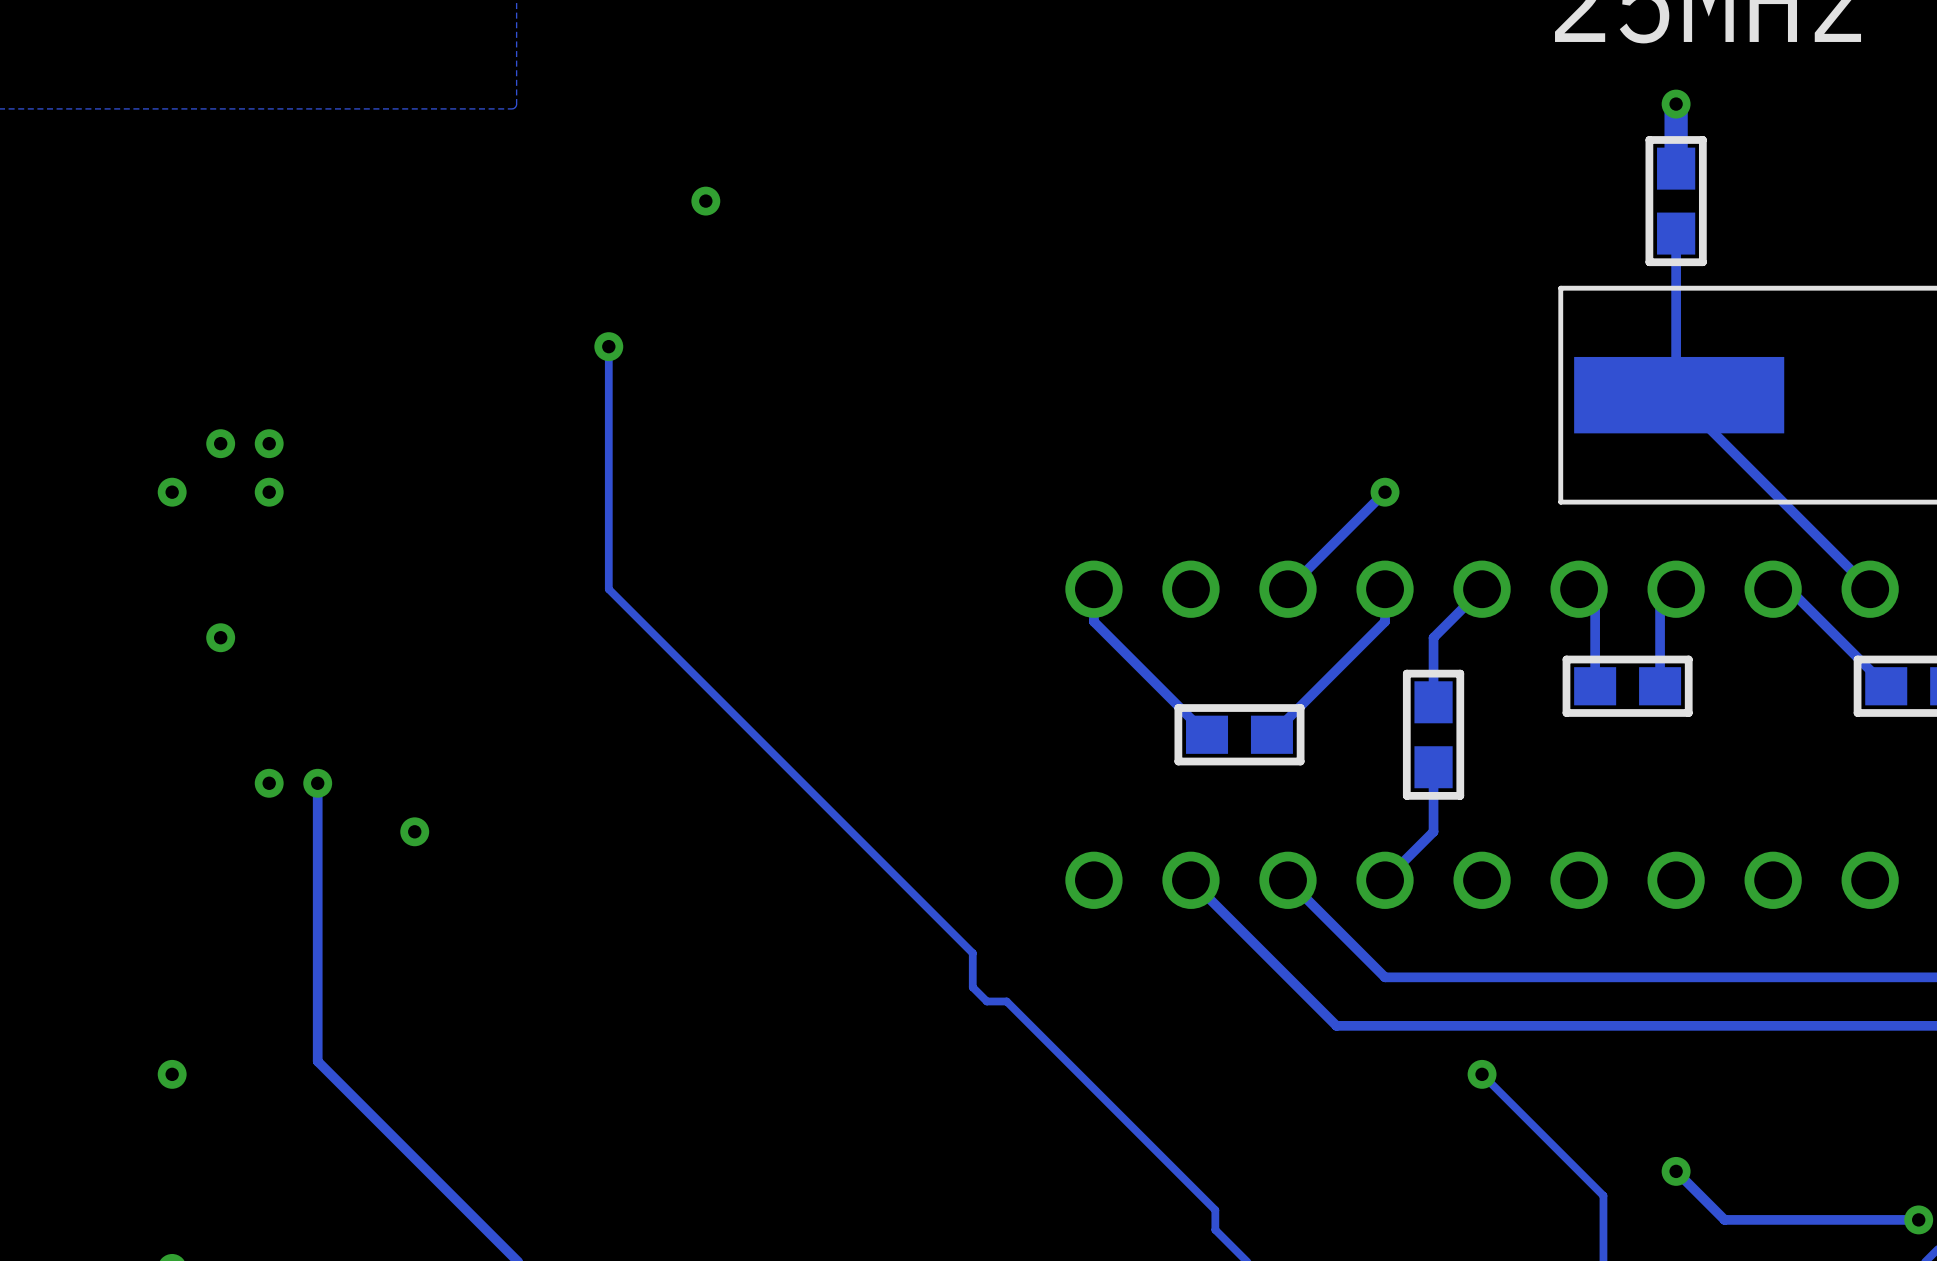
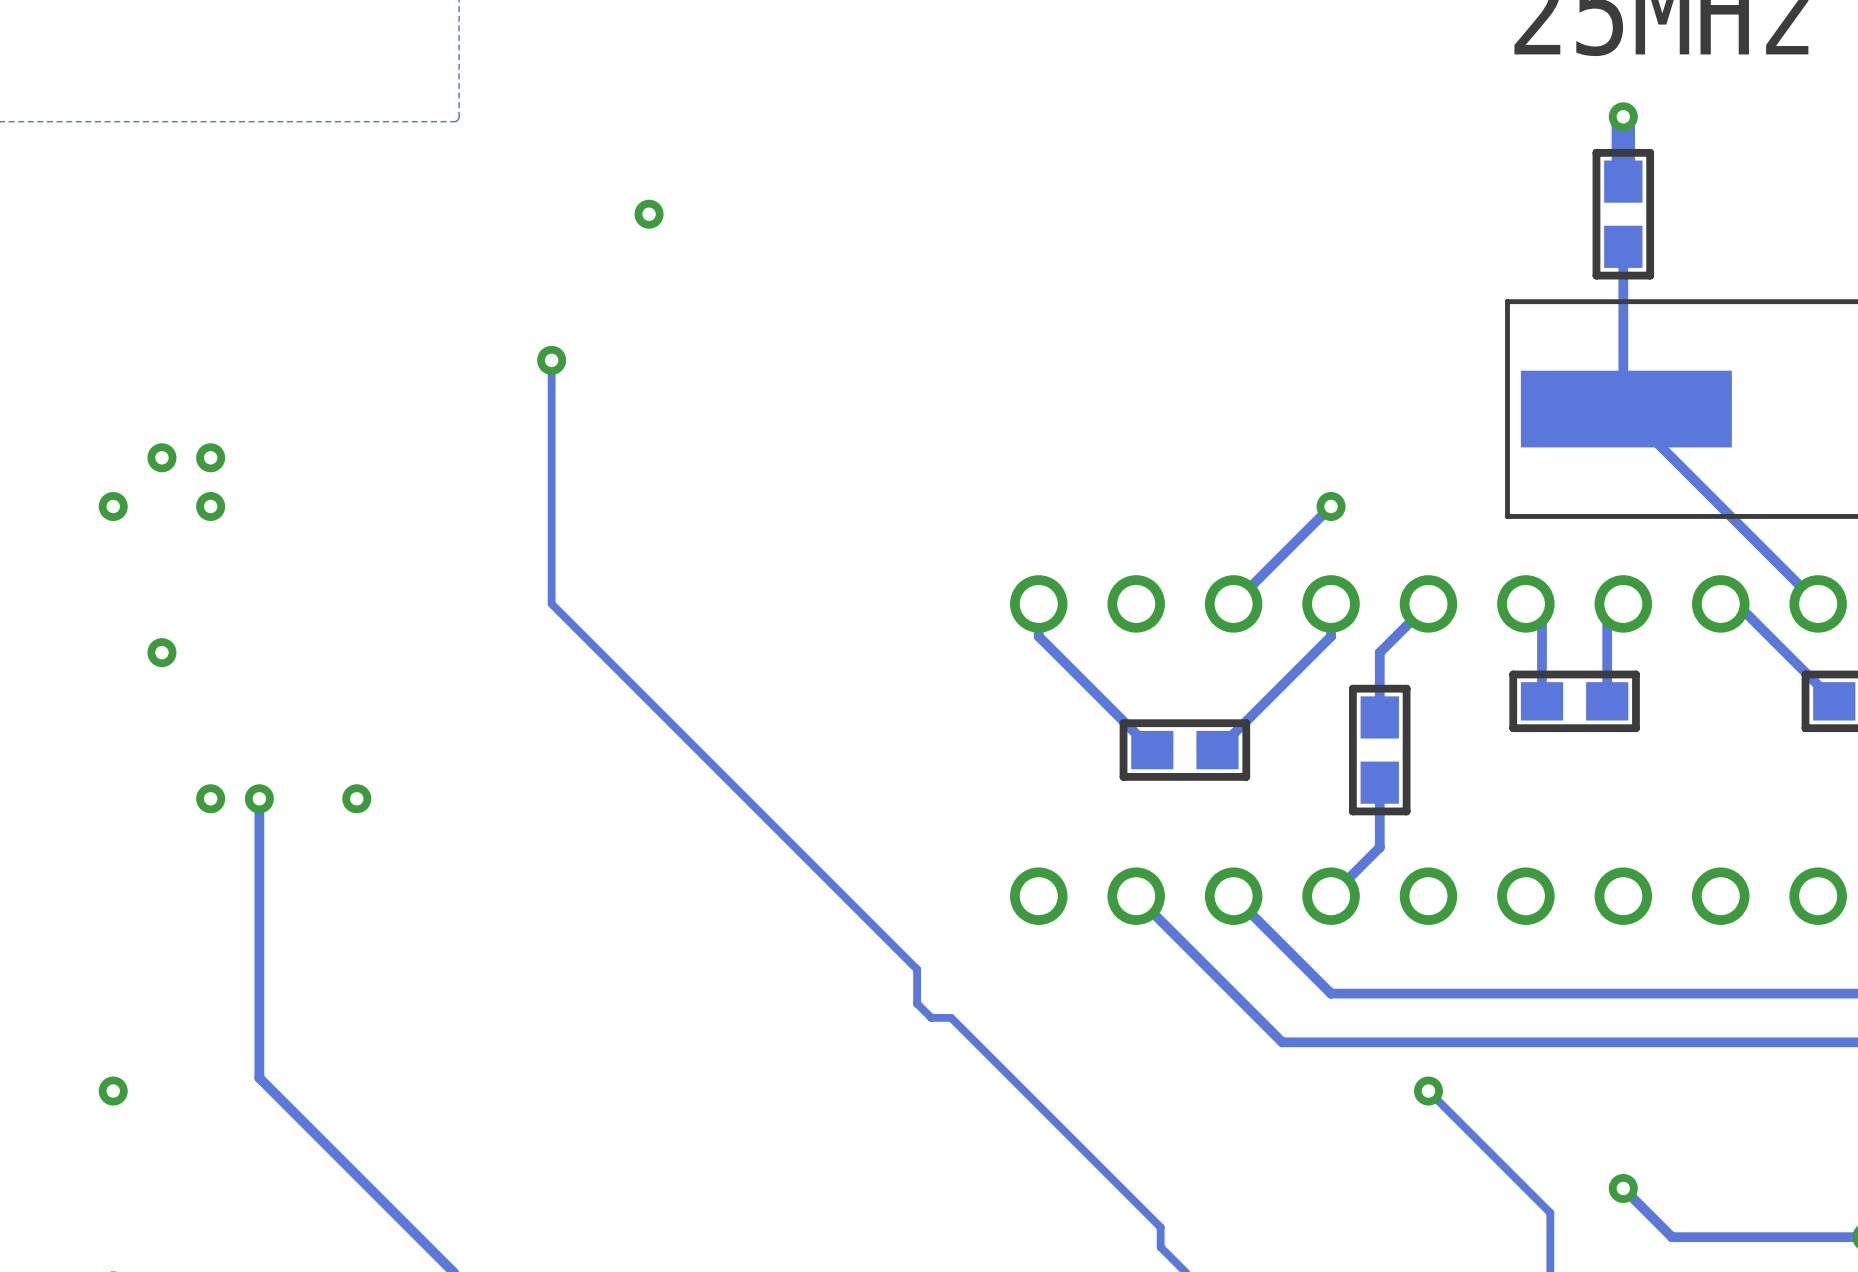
via position: (414, 831) -> (356, 798)

